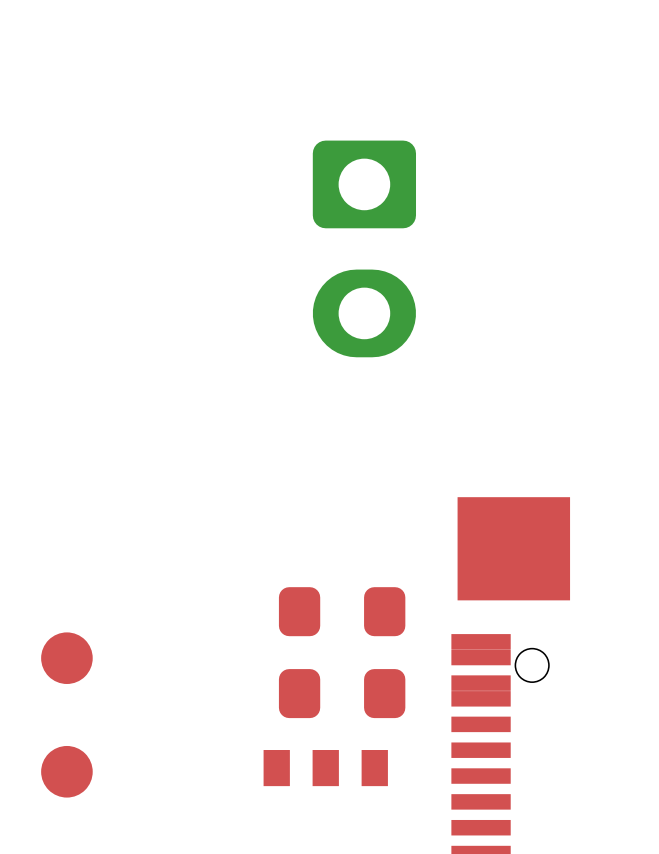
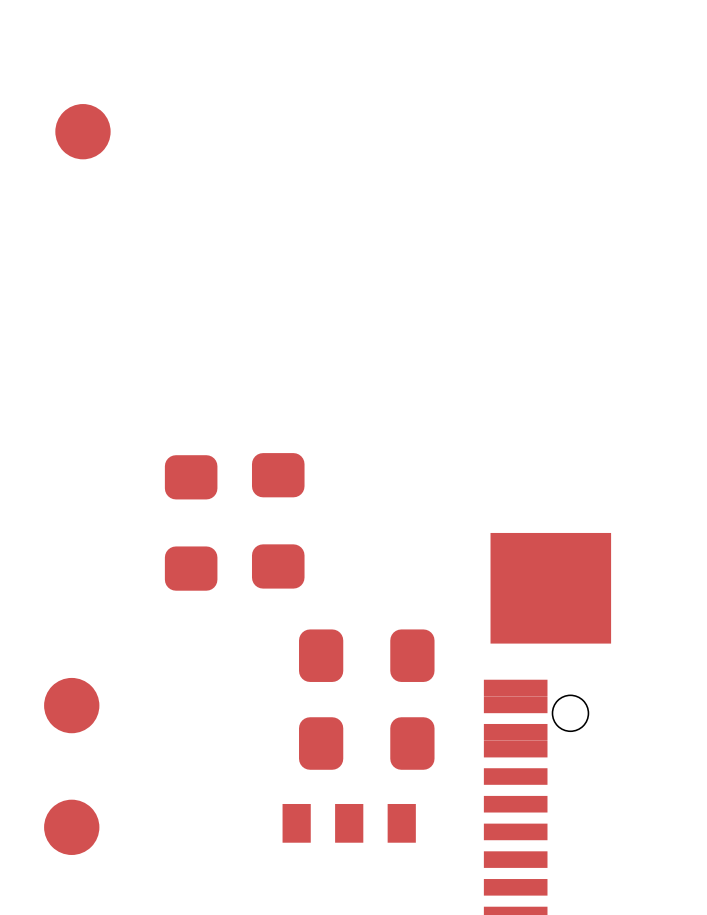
part: none -> (82, 131)
part: (364, 248) -> none
part: none -> (278, 520)
part: none -> (191, 522)

